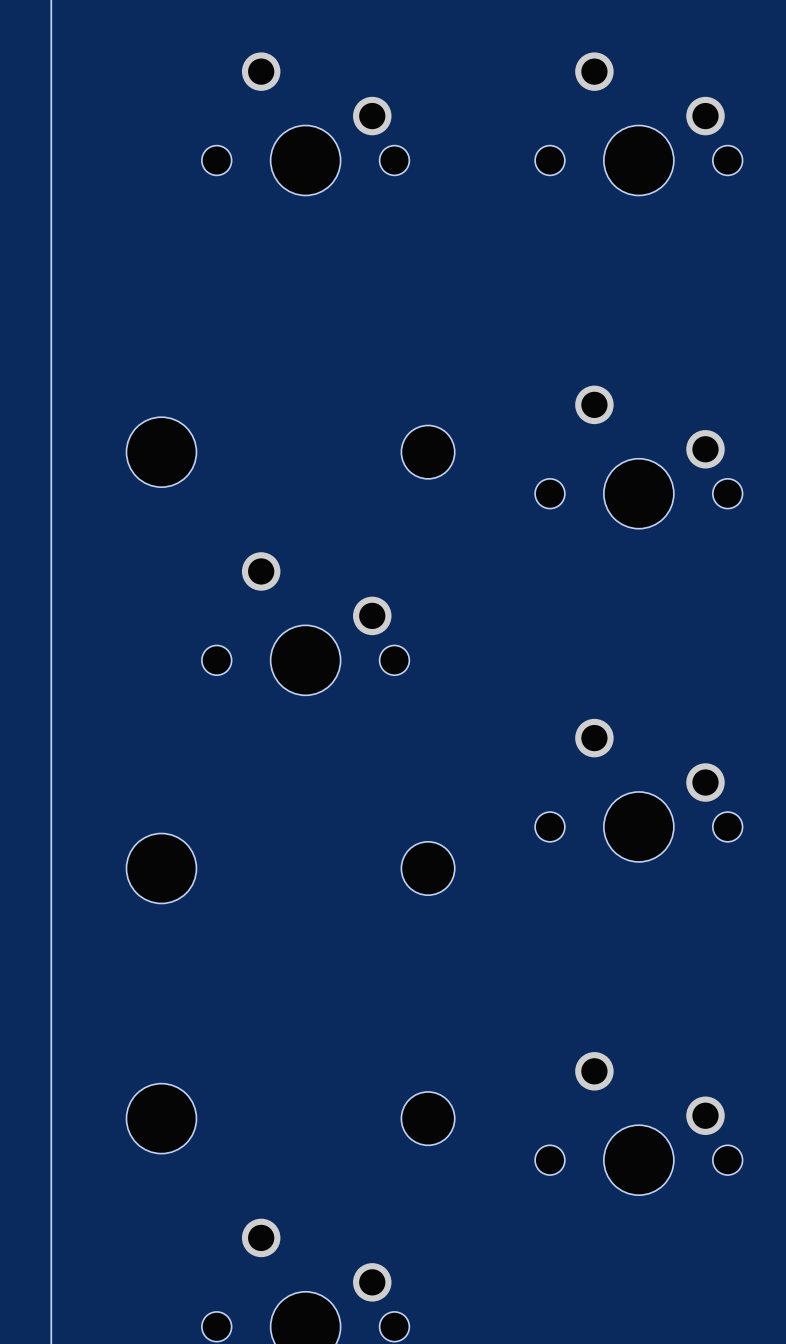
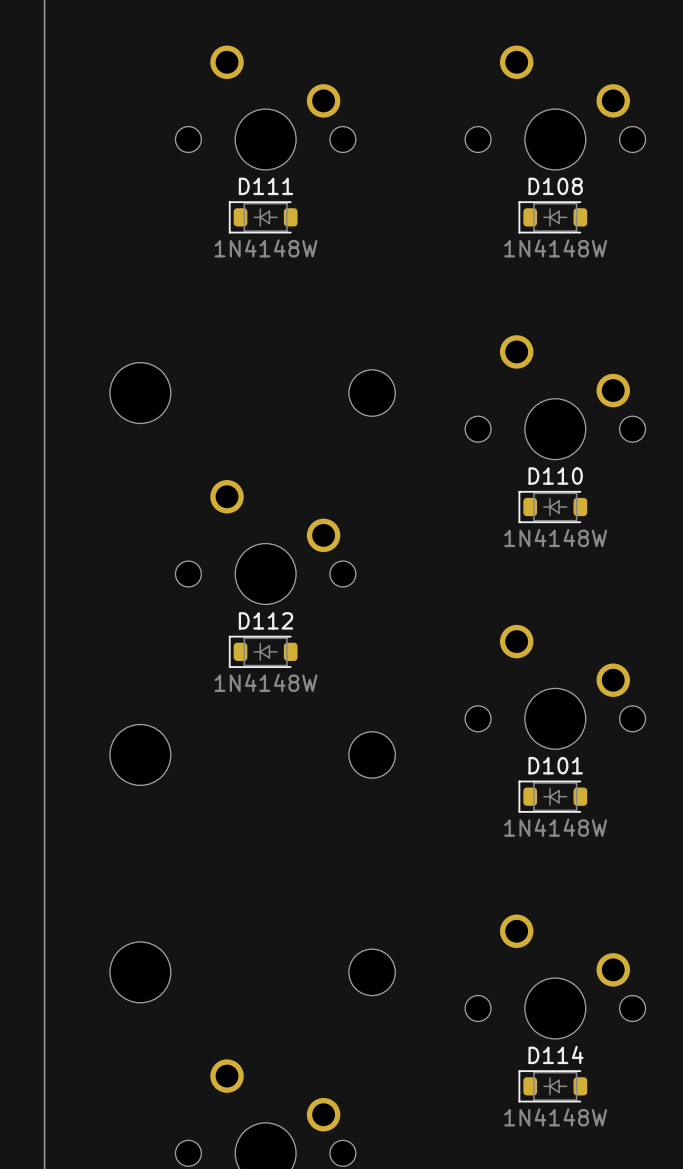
D111: none -> 1N4148W (263, 217)
D108: none -> 1N4148W (552, 217)
D110: none -> 1N4148W (552, 507)
D112: none -> 1N4148W (263, 651)
D101: none -> 1N4148W (552, 796)
D114: none -> 1N4148W (552, 1086)

